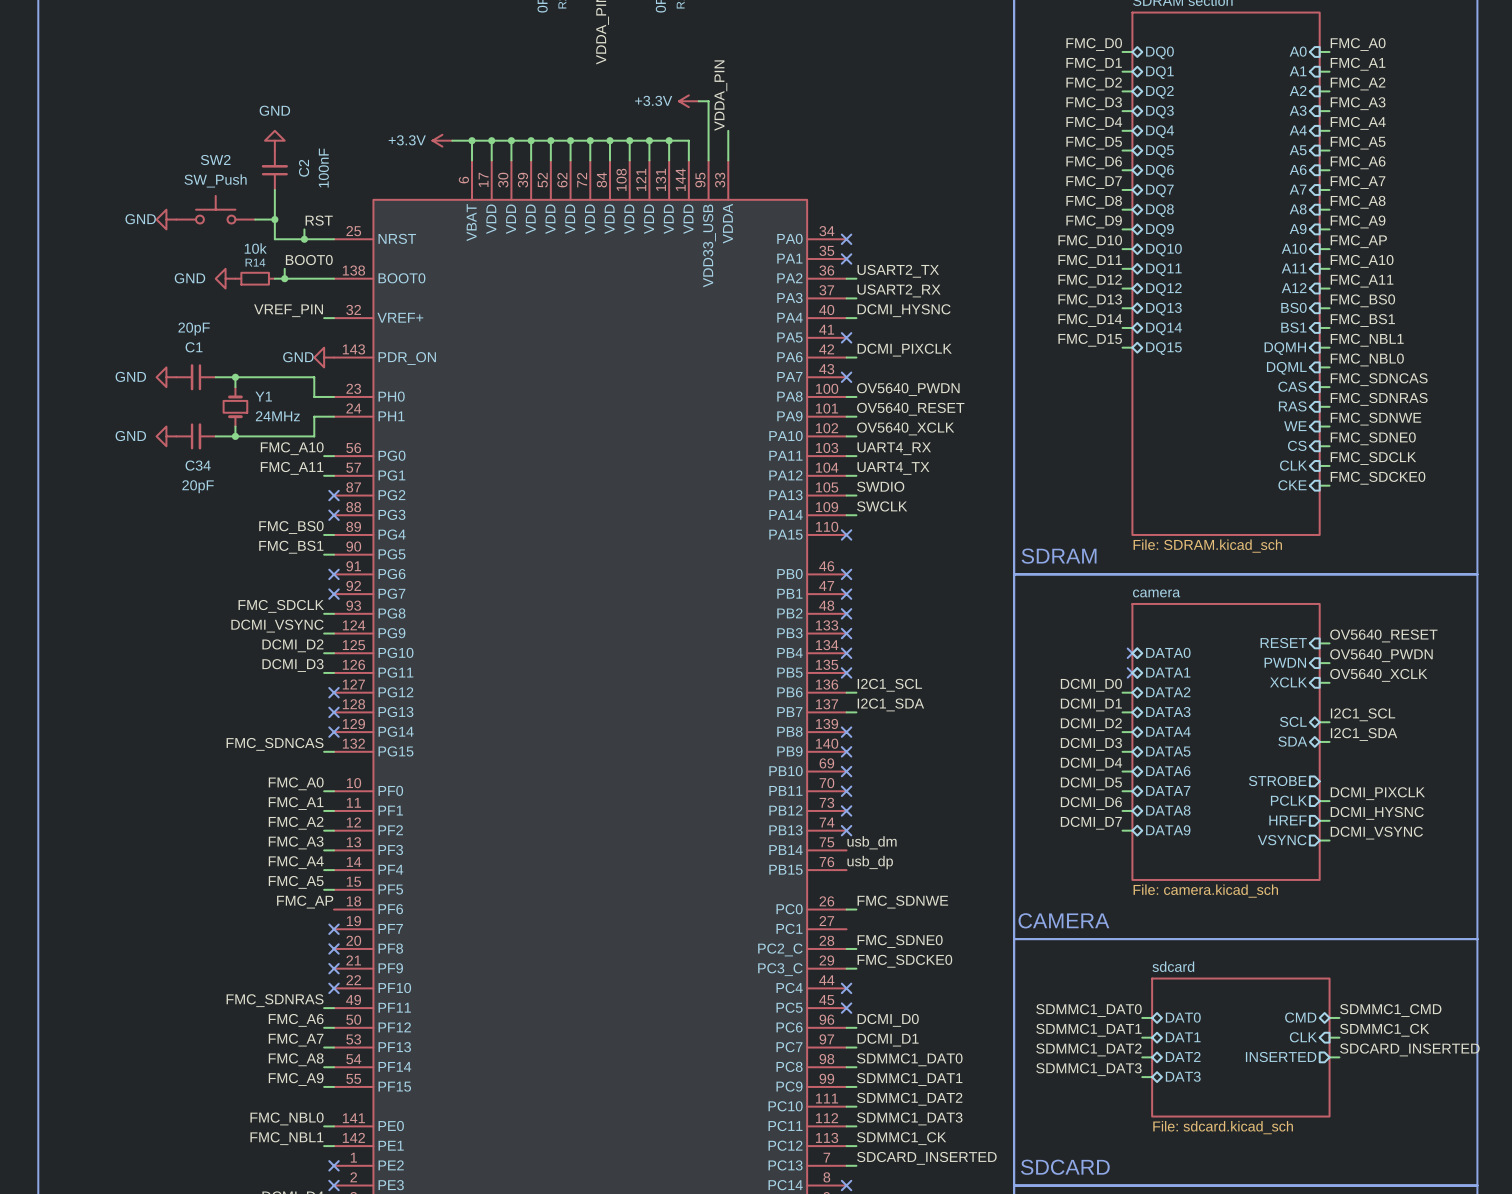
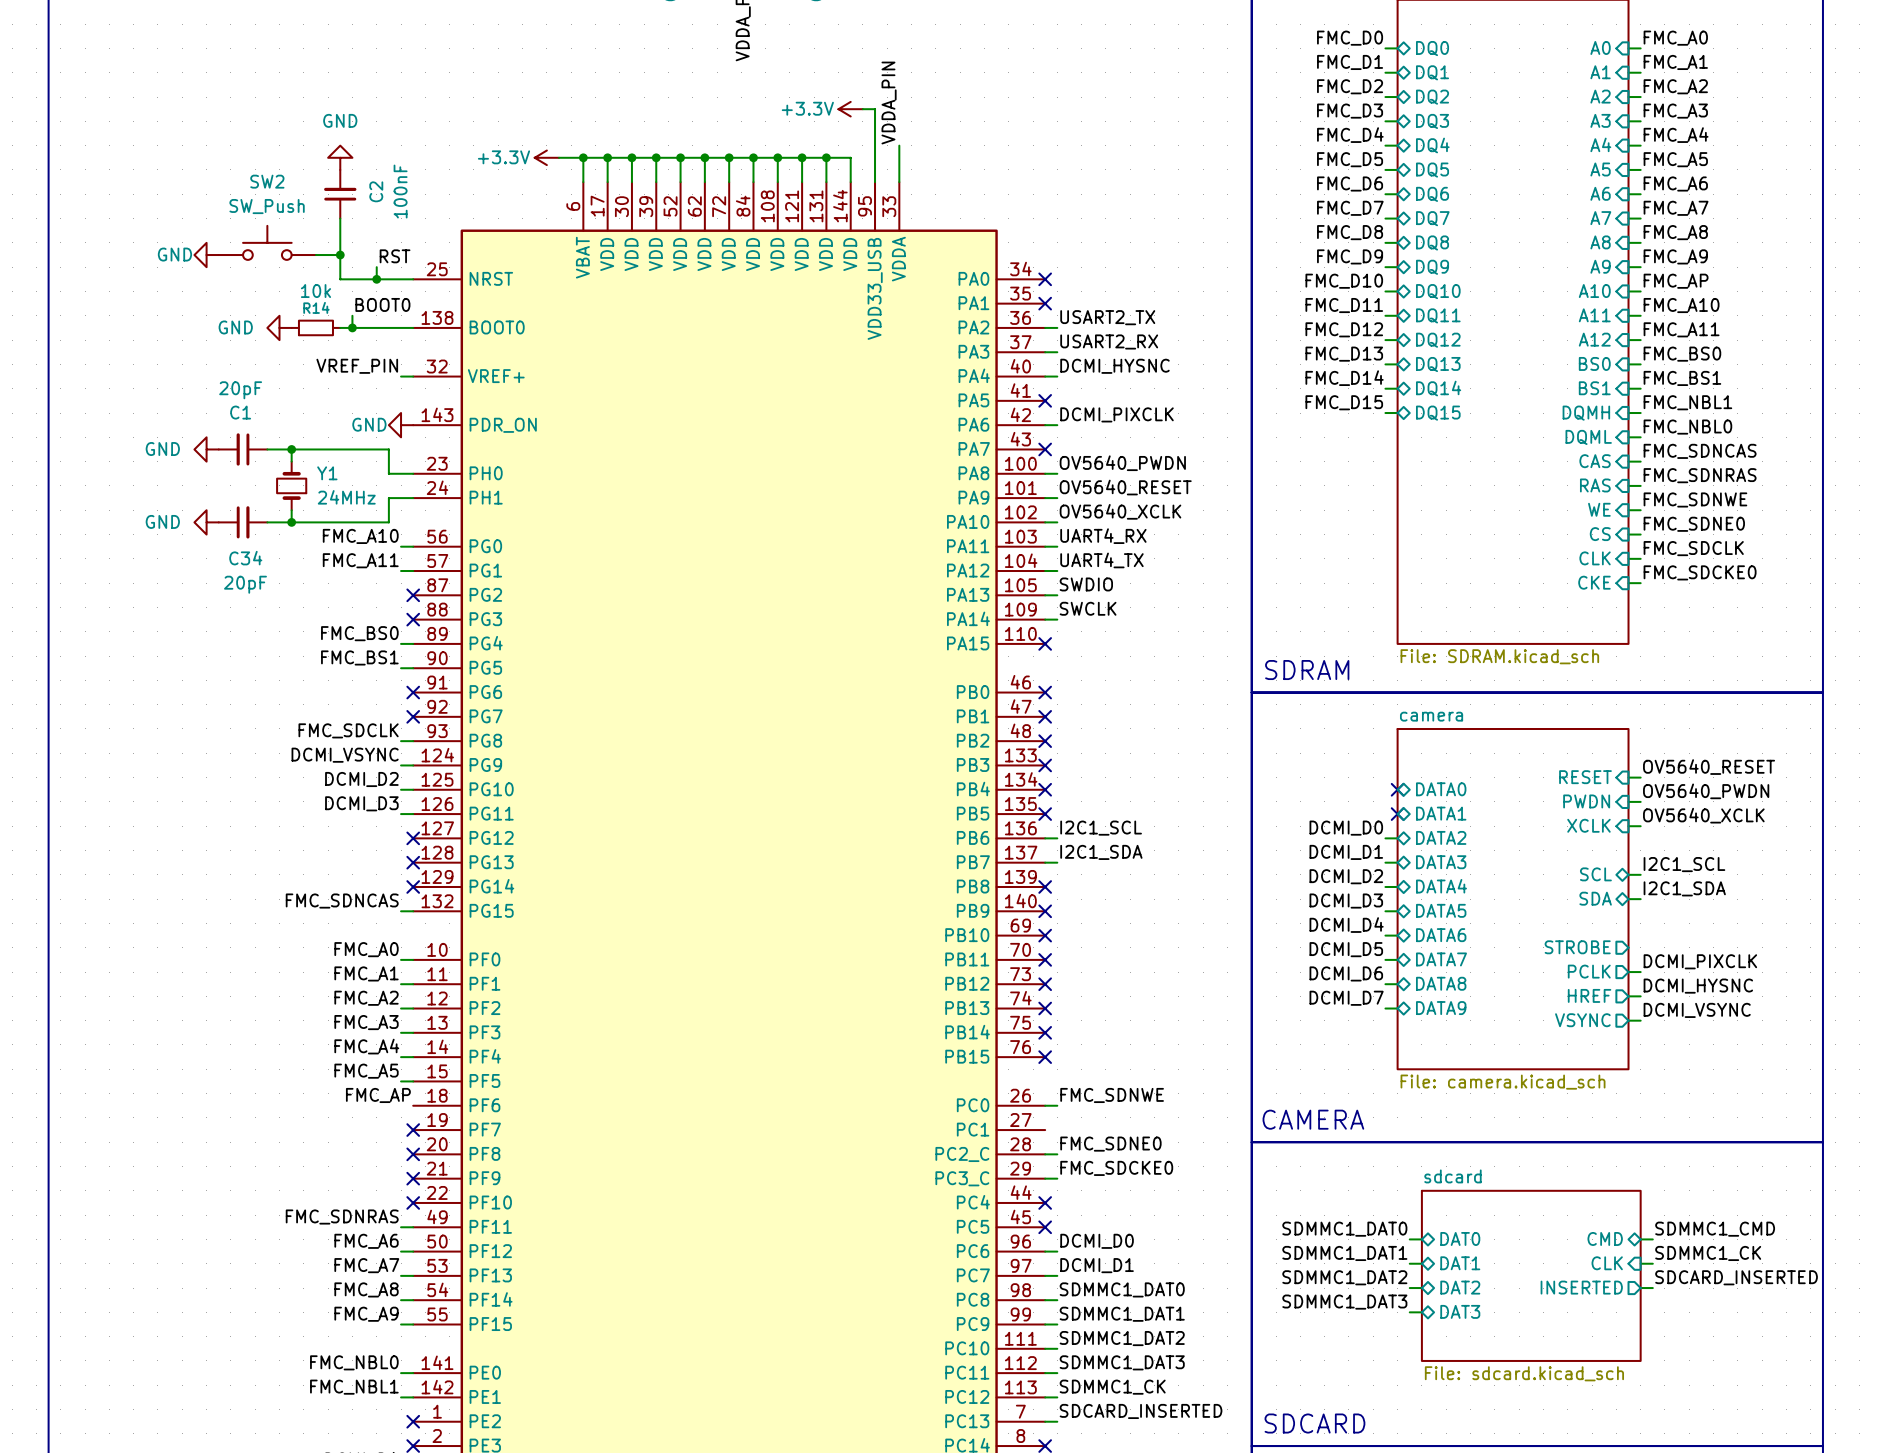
label: usb_dm (872, 842) -> none
no-connect mark: none -> (1045, 1032)
label: usb_dp (870, 862) -> none
no-connect mark: none -> (1045, 1057)

